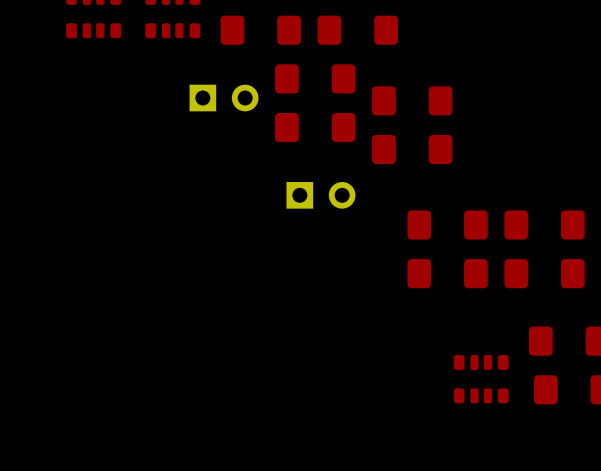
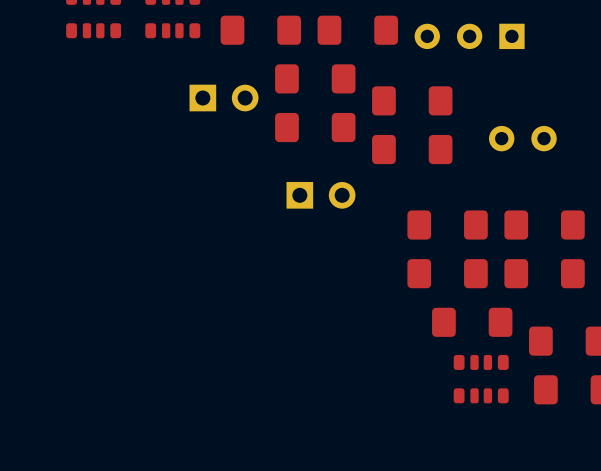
part: none -> (469, 36)
part: none -> (522, 138)
part: none -> (472, 322)

